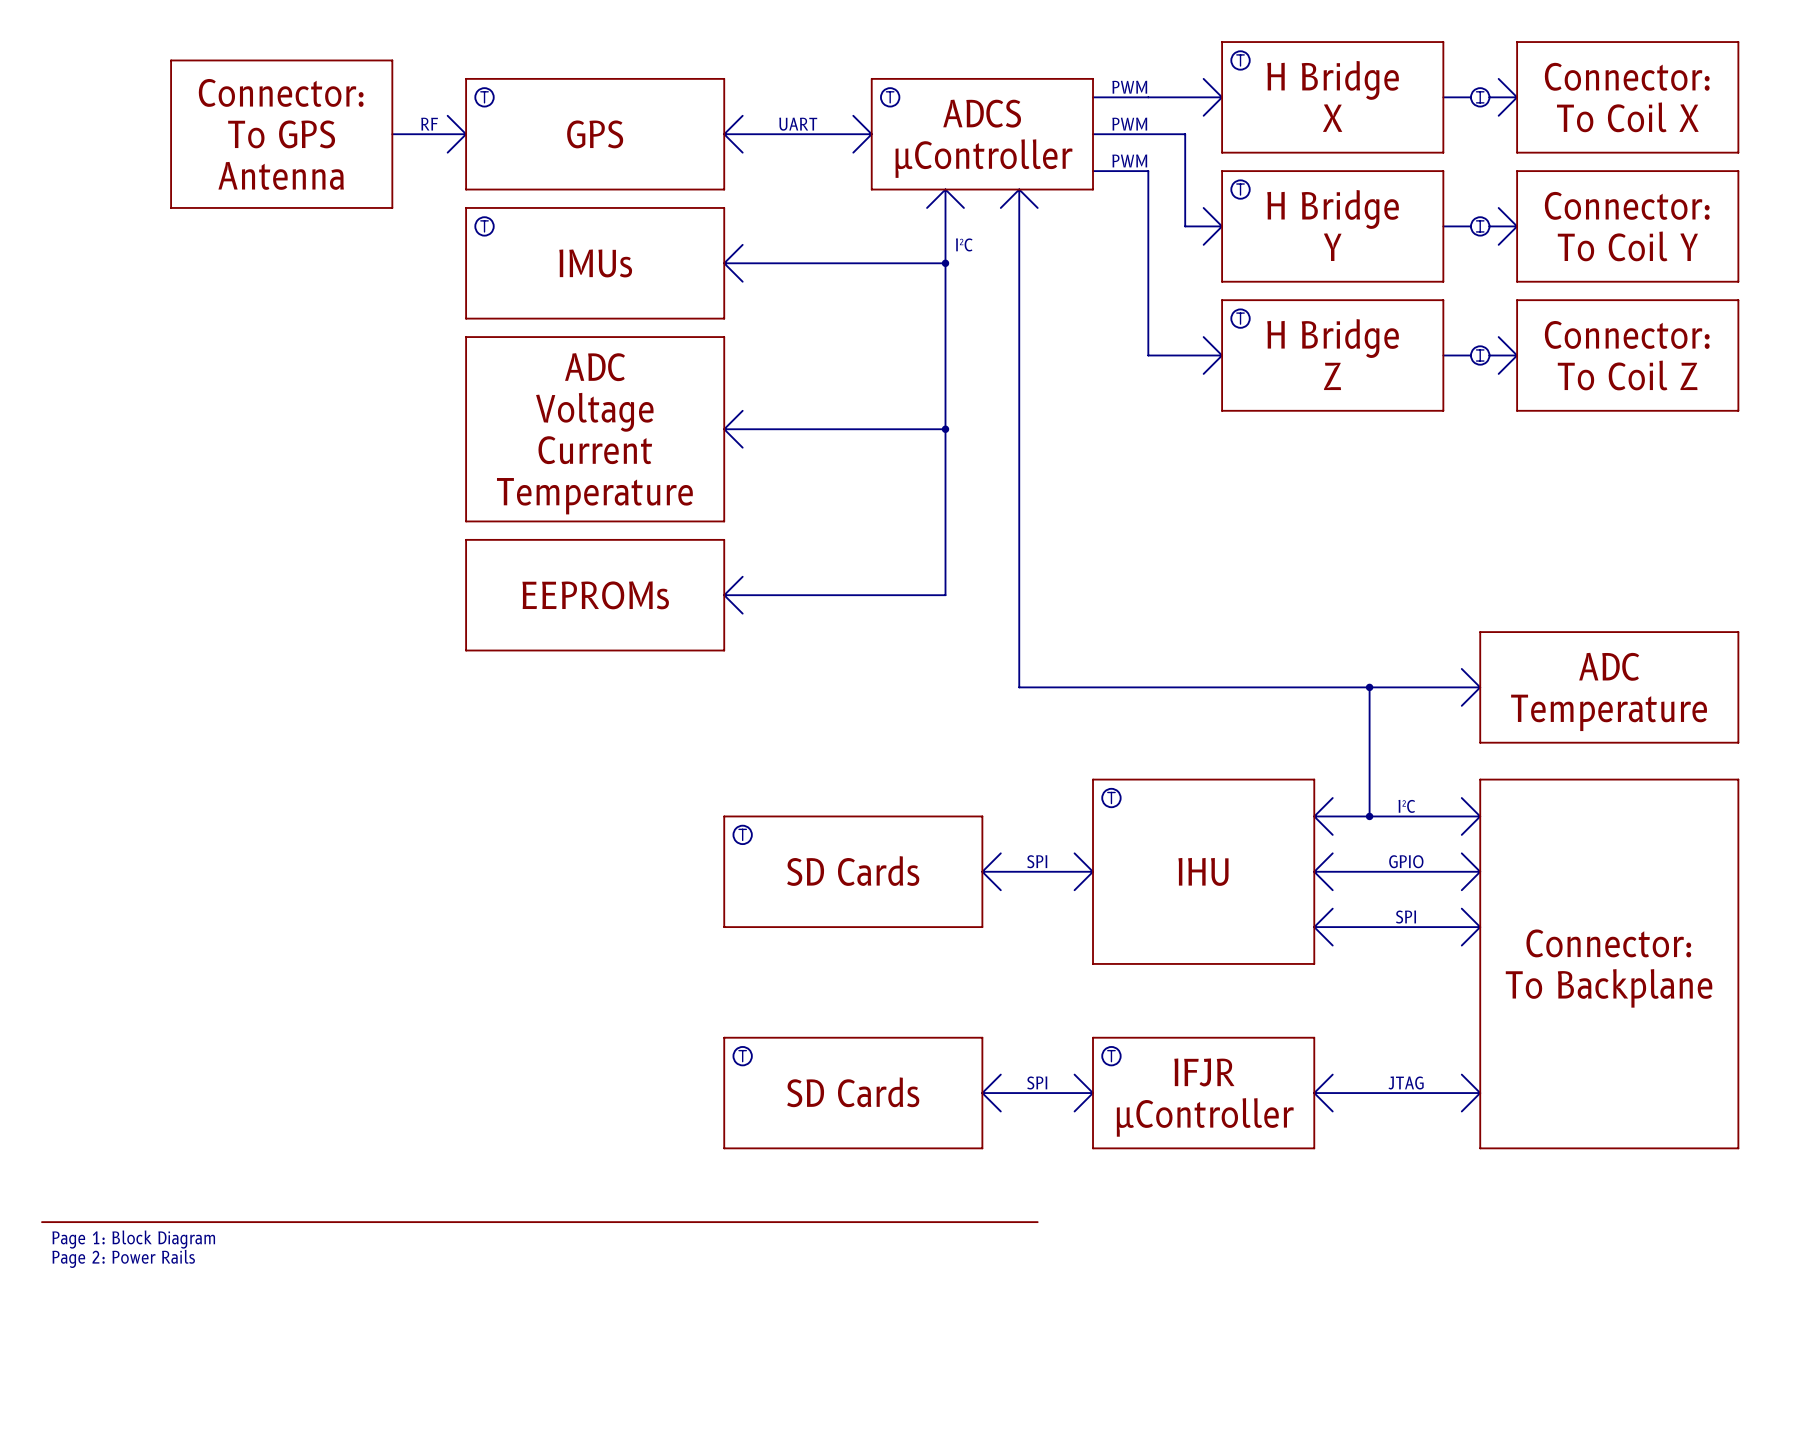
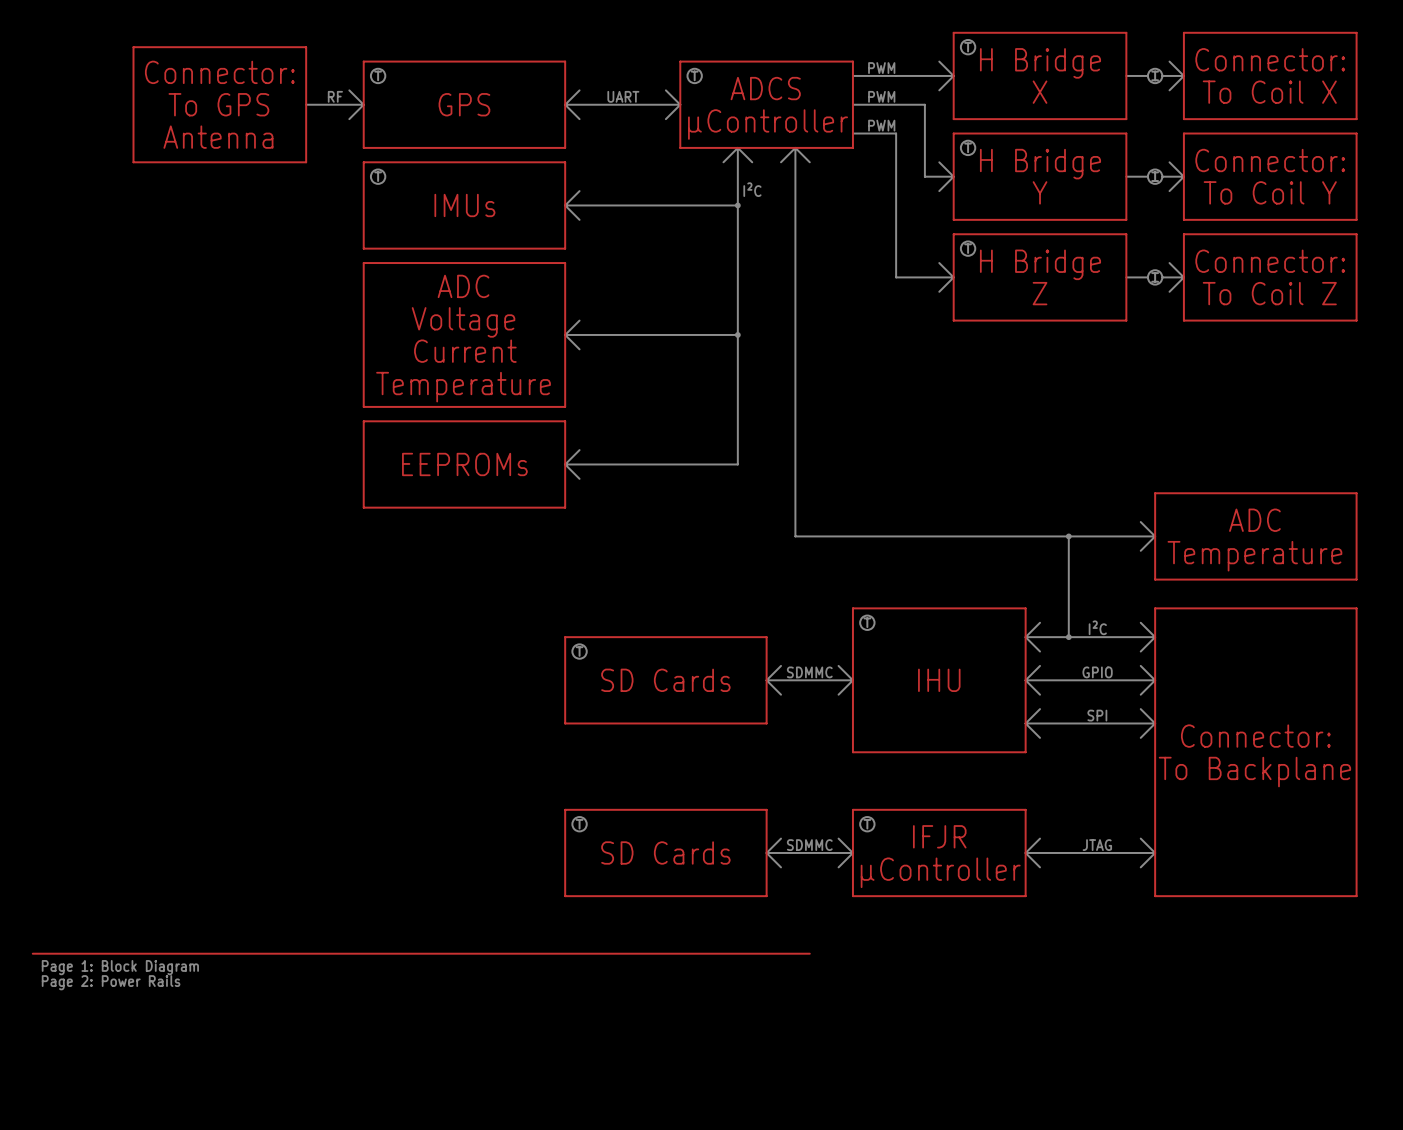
text: SPI (1037, 861) -> SDMMC (809, 672)
text: SPI (1037, 1082) -> SDMMC (809, 845)

